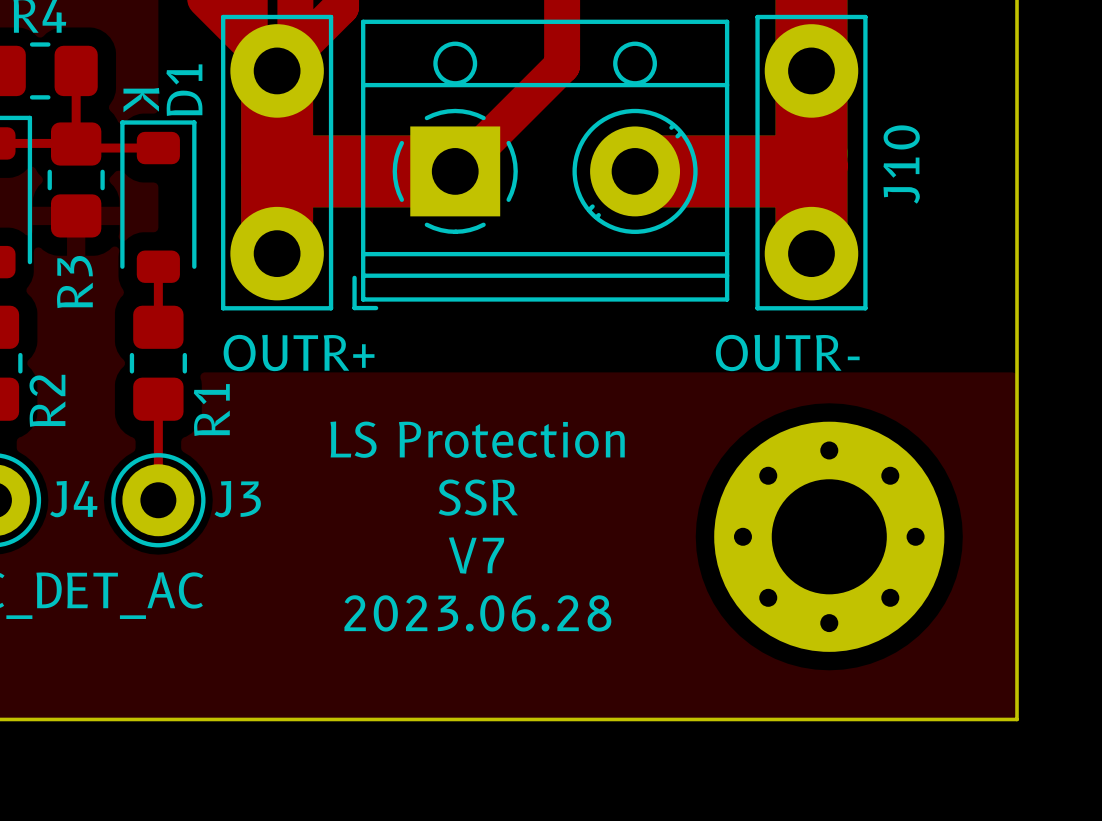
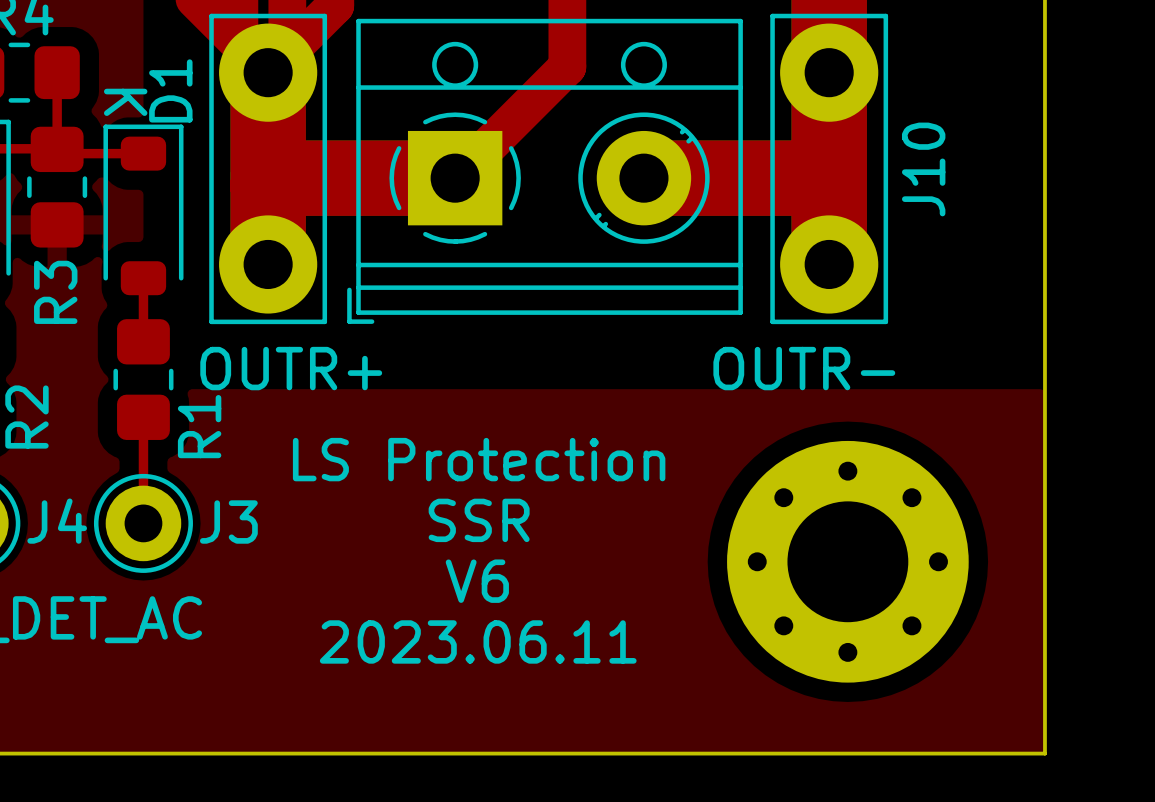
text: V7 (476, 555) -> V6 (477, 581)
text: 2023.06.28 (477, 613) -> 2023.06.11 (478, 641)

